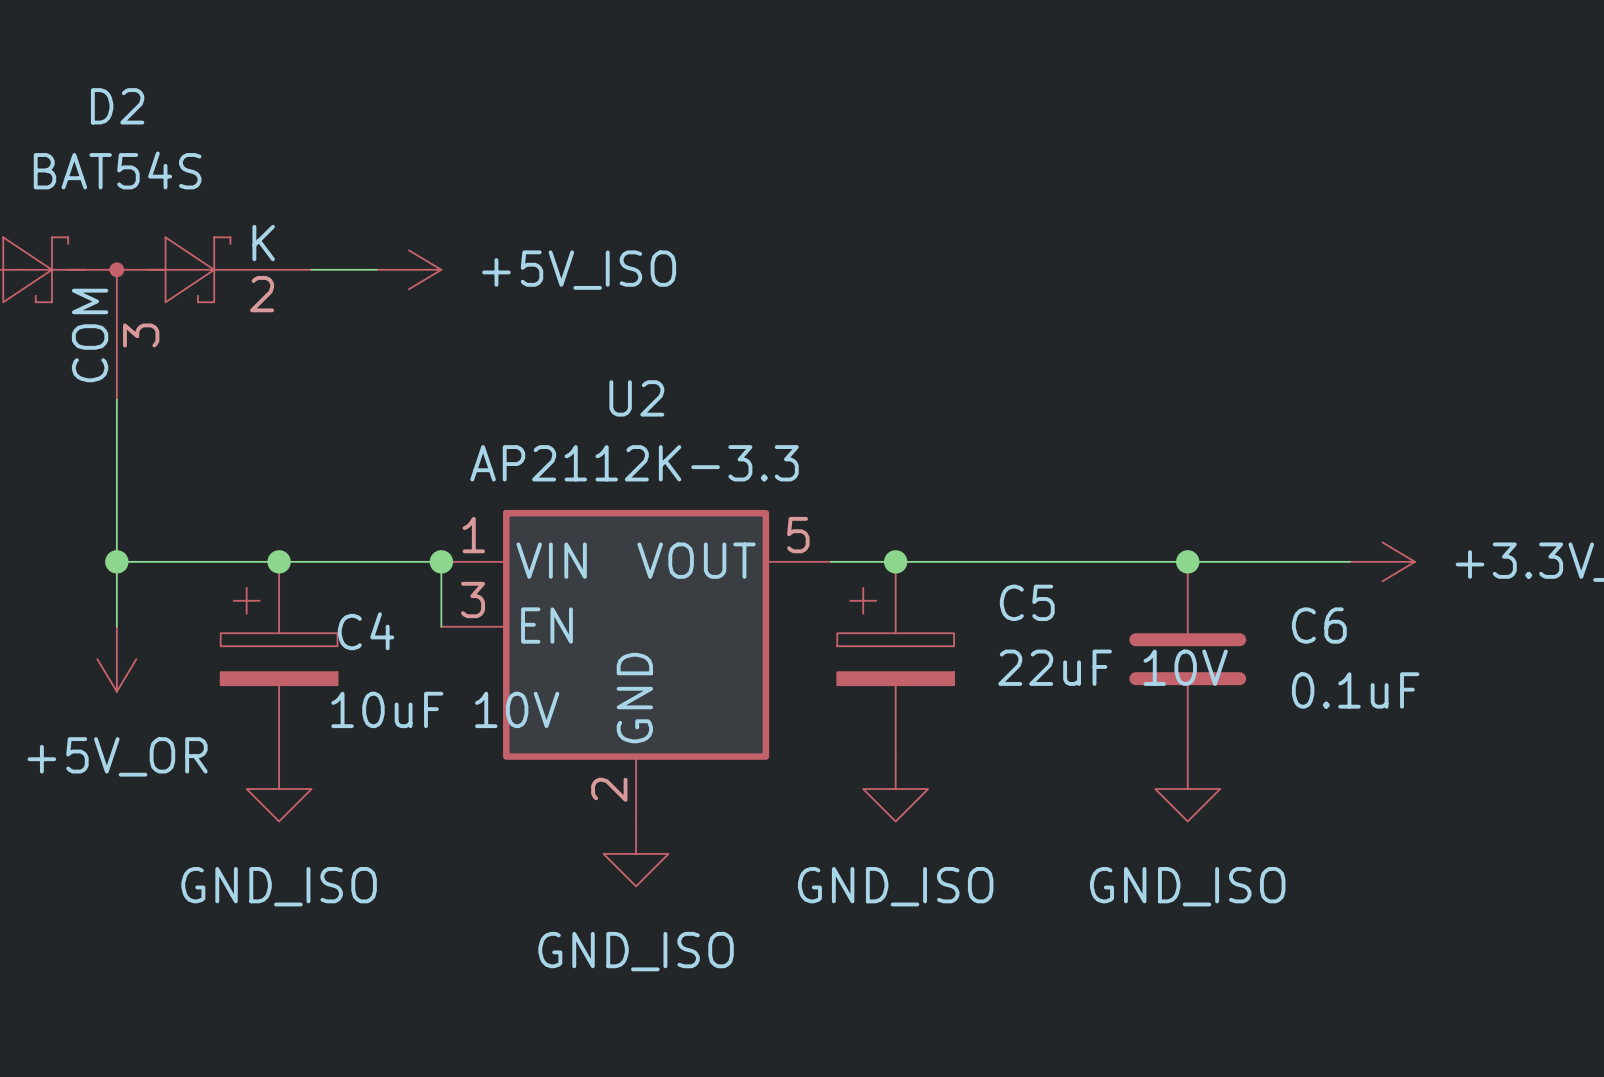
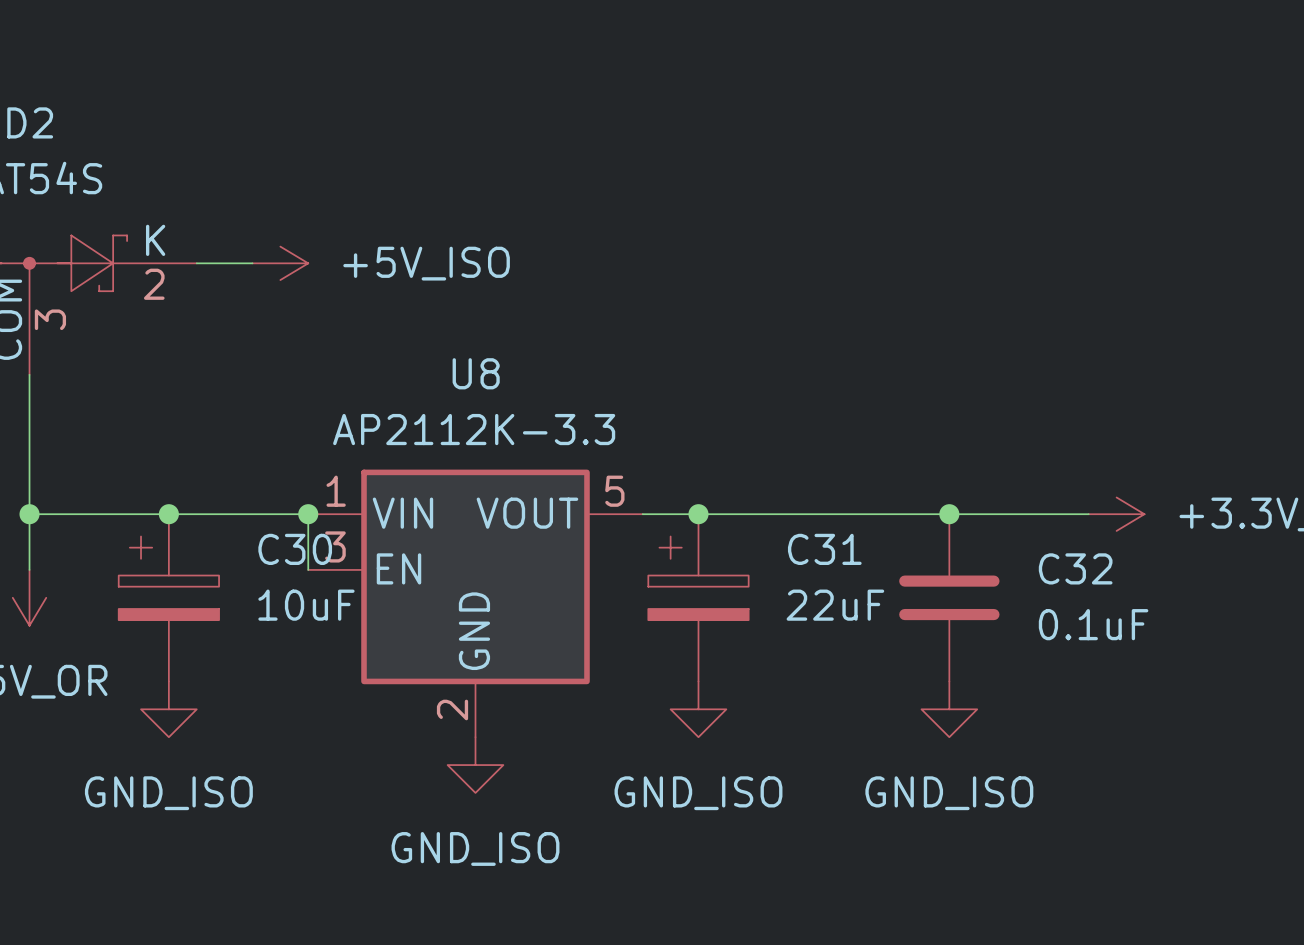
U2 name: U2 (636, 398) -> U8 (476, 373)
C5 name: C5 (1027, 602) -> C31 (824, 549)
C6 name: C6 (1319, 625) -> C32 (1075, 568)
C4 name: C4 (366, 631) -> C30 (295, 549)
C5 value: 22uF 10V (1113, 667) -> 22uF (835, 605)
C4 value: 10uF 10V (445, 709) -> 10uF (306, 605)

